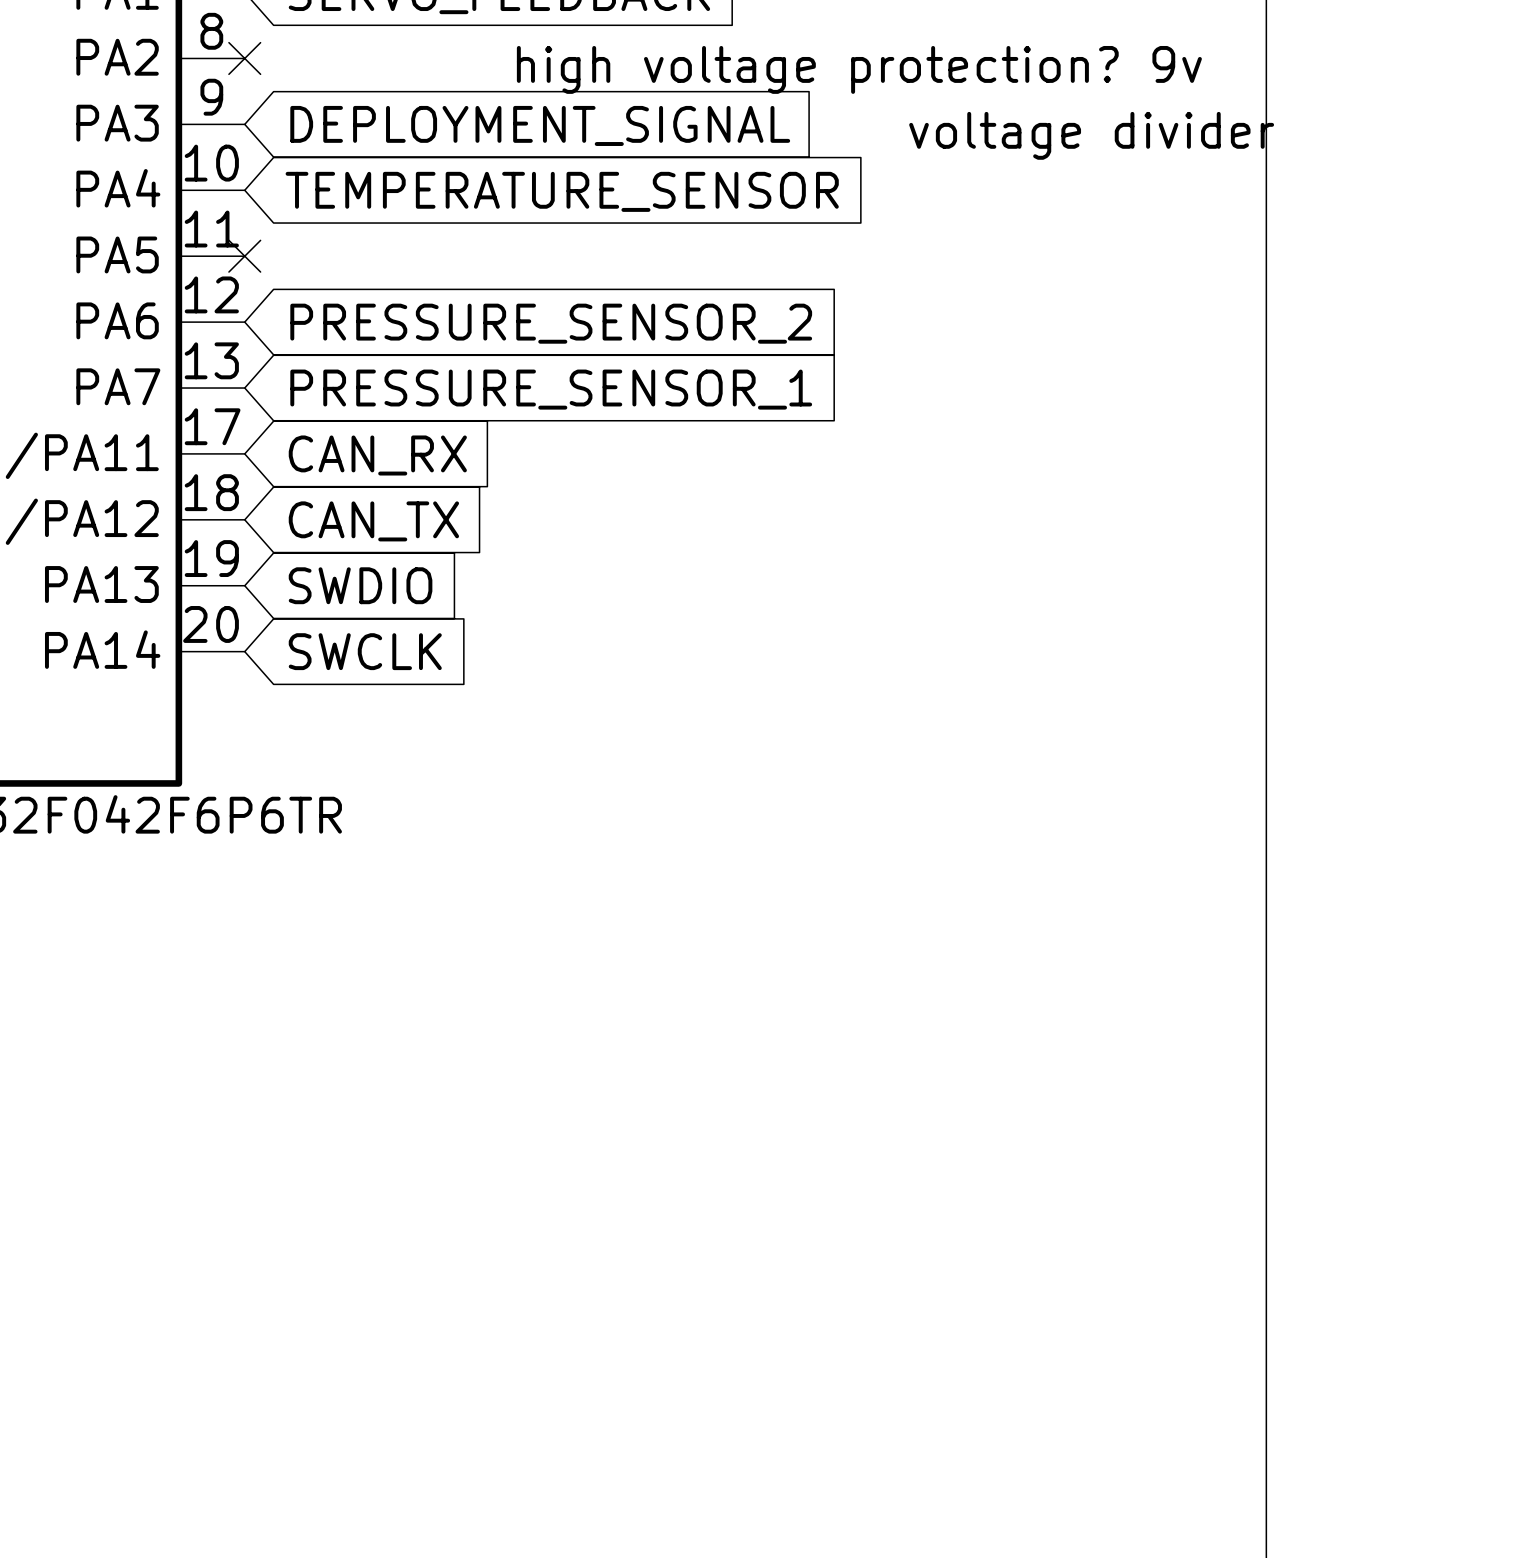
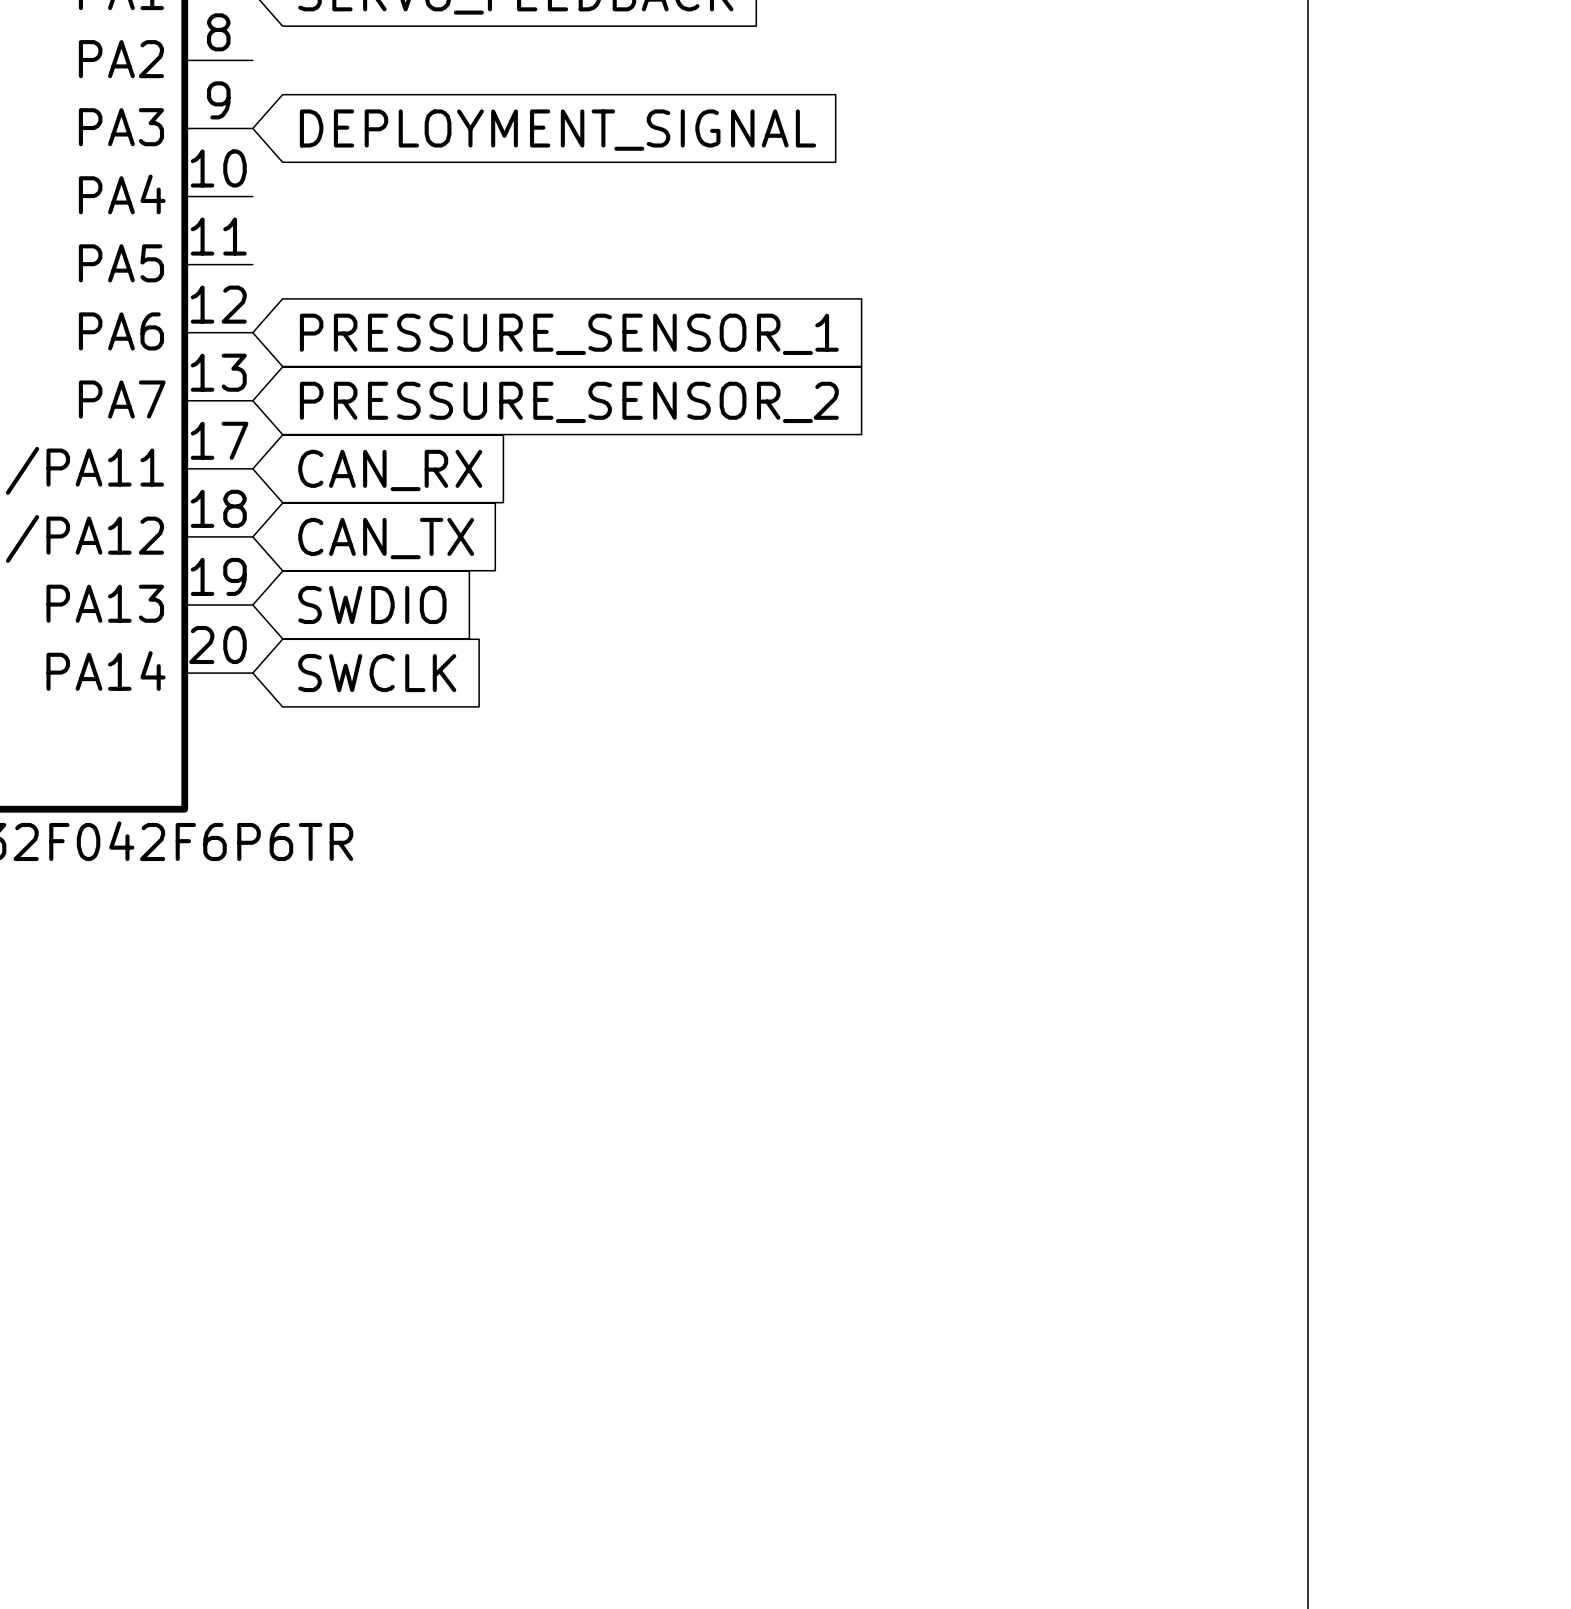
no-connect mark: (244, 58) -> none
text: high voltage protection? 9v (859, 69) -> none
text: voltage divider (1091, 135) -> none
global label: TEMPERATURE_SENSOR (562, 191) -> none
no-connect mark: (244, 256) -> none
global label: PRESSURE_SENSOR_2 (551, 323) -> PRESSURE_SENSOR_1 (569, 334)
global label: PRESSURE_SENSOR_1 (551, 389) -> PRESSURE_SENSOR_2 (569, 402)

